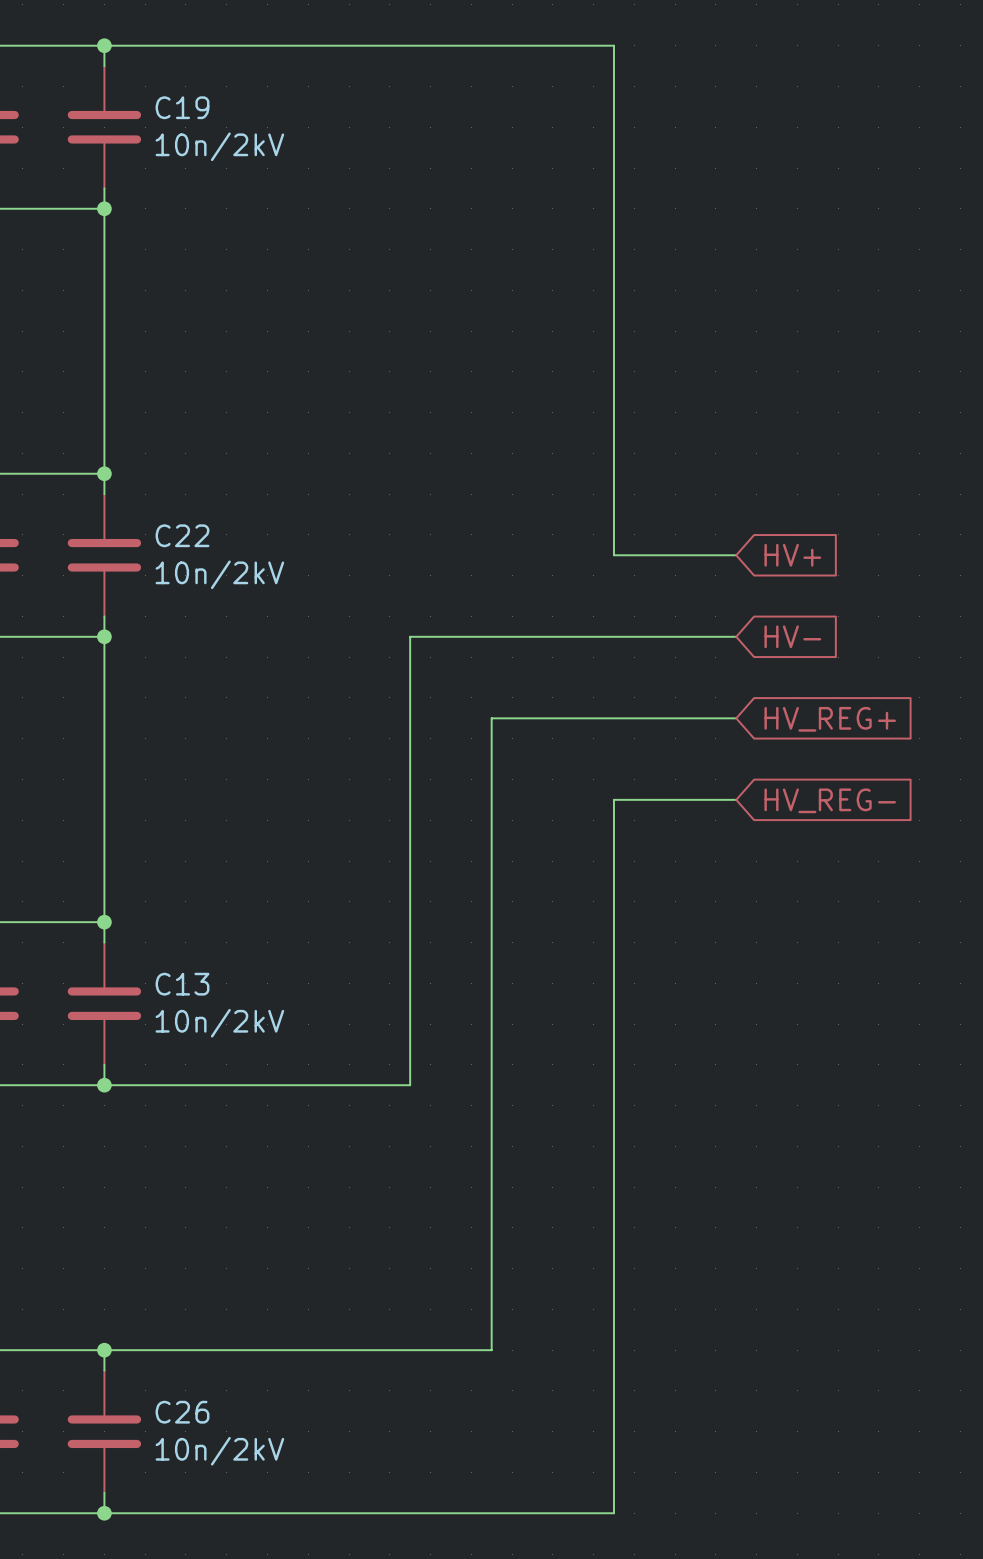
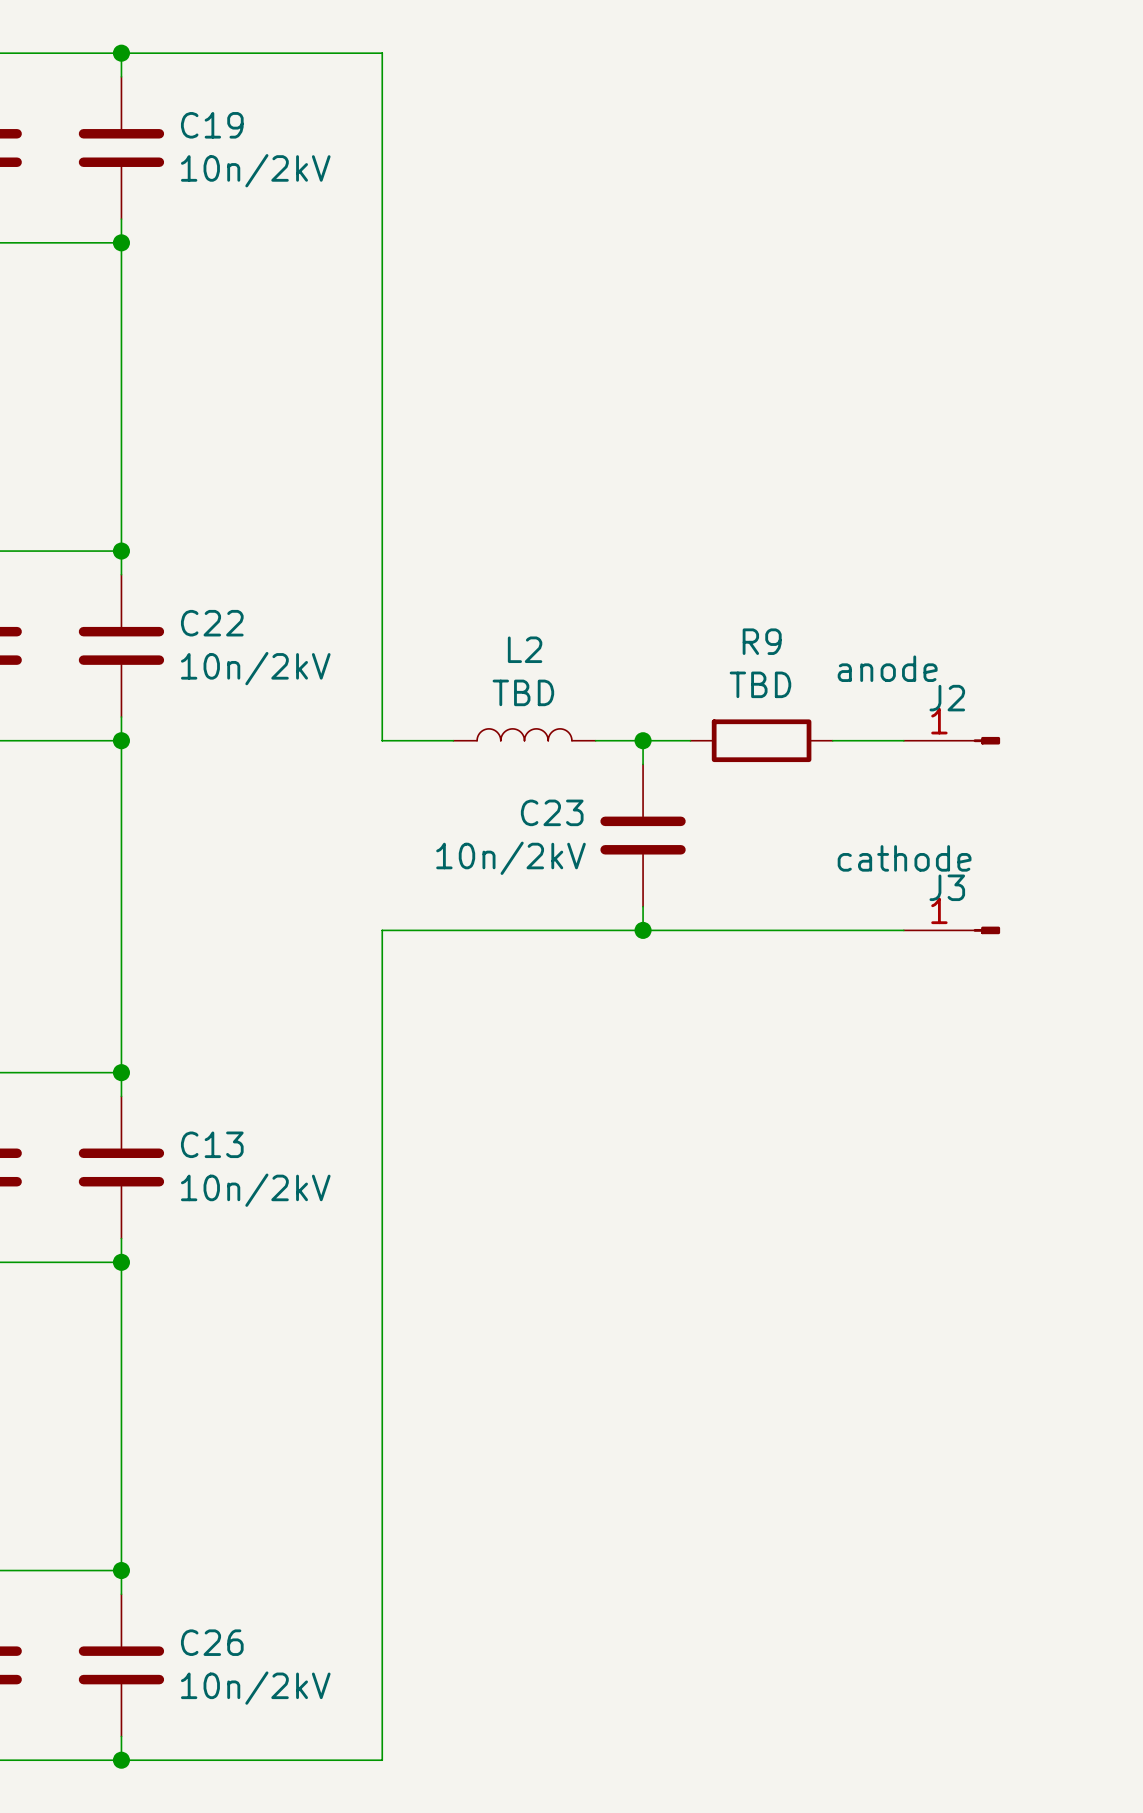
wire: (328, 45) (613, 45) (613, 555) (736, 555) -> (382, 53) (382, 740) (453, 740)
global label: HV+ (792, 555) -> none
L2: none -> TBD (524, 734)
wire: (512, 636) (410, 636) (410, 1085) (104, 1085) -> none
wire: none -> (643, 740) (643, 764)
junction: none -> (643, 740)
wire: (593, 636) (715, 636) -> none
R9: none -> TBD (761, 740)
wire: none -> (856, 740) (903, 740)
global label: HV- (792, 636) -> none
J2: none -> anode (951, 740)
C23: none -> 10n/2kV (643, 835)
wire: (736, 718) (491, 718) (491, 1350) (104, 1350) -> (121, 1262) (121, 1570)
global label: HV_REG+ (830, 719) -> none
wire: none -> (643, 906) (643, 930)
junction: none -> (643, 930)
wire: (613, 799) (613, 1513) (328, 1513) -> (714, 930) (382, 930) (382, 1760)
wire: none -> (856, 930) (903, 930)
J3: none -> cathode (951, 930)
global label: HV_REG- (830, 800) -> none

